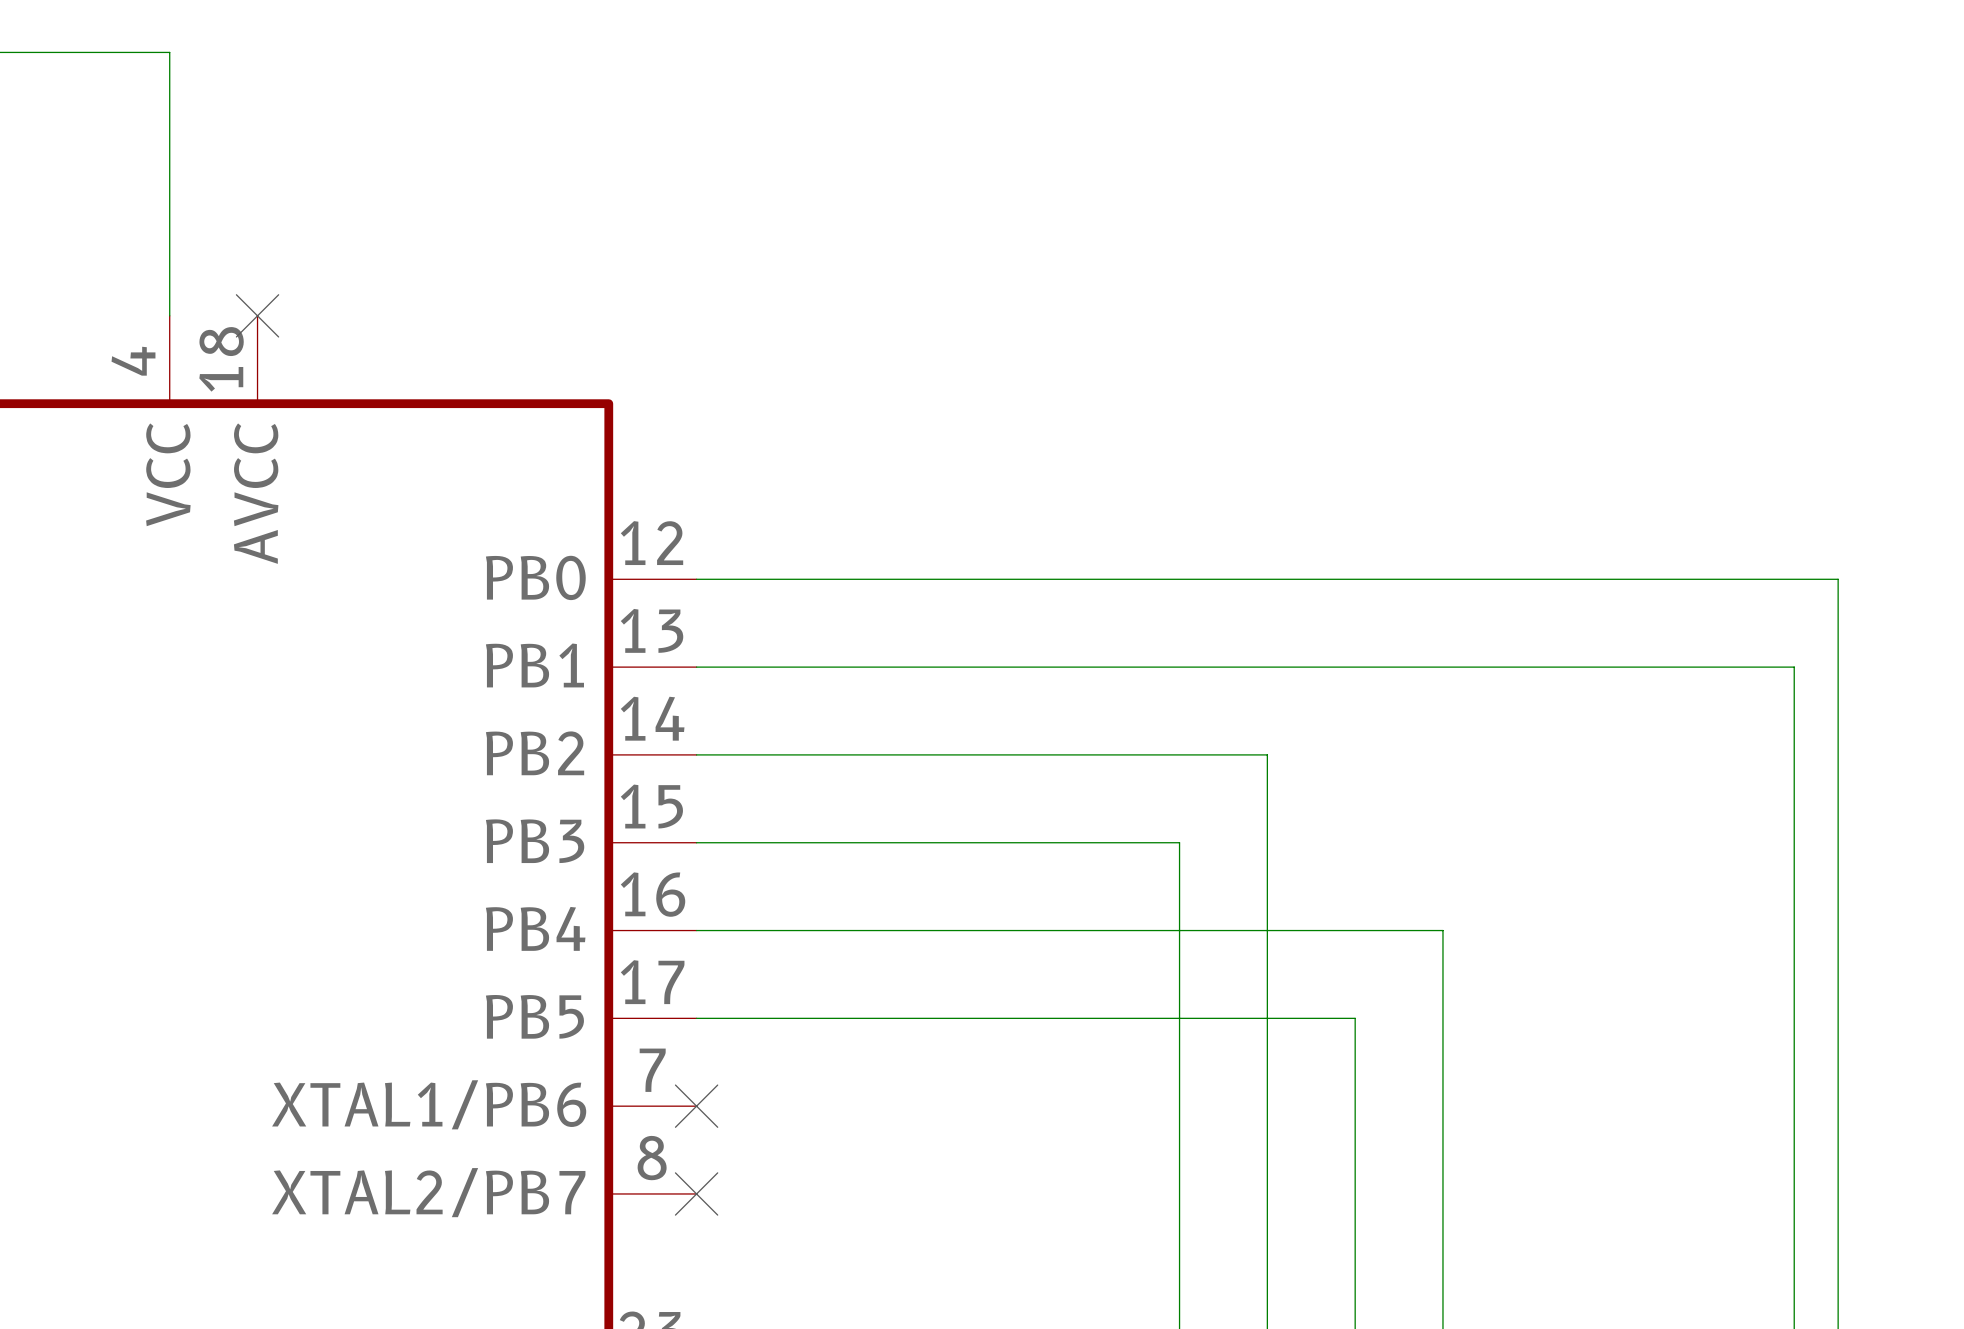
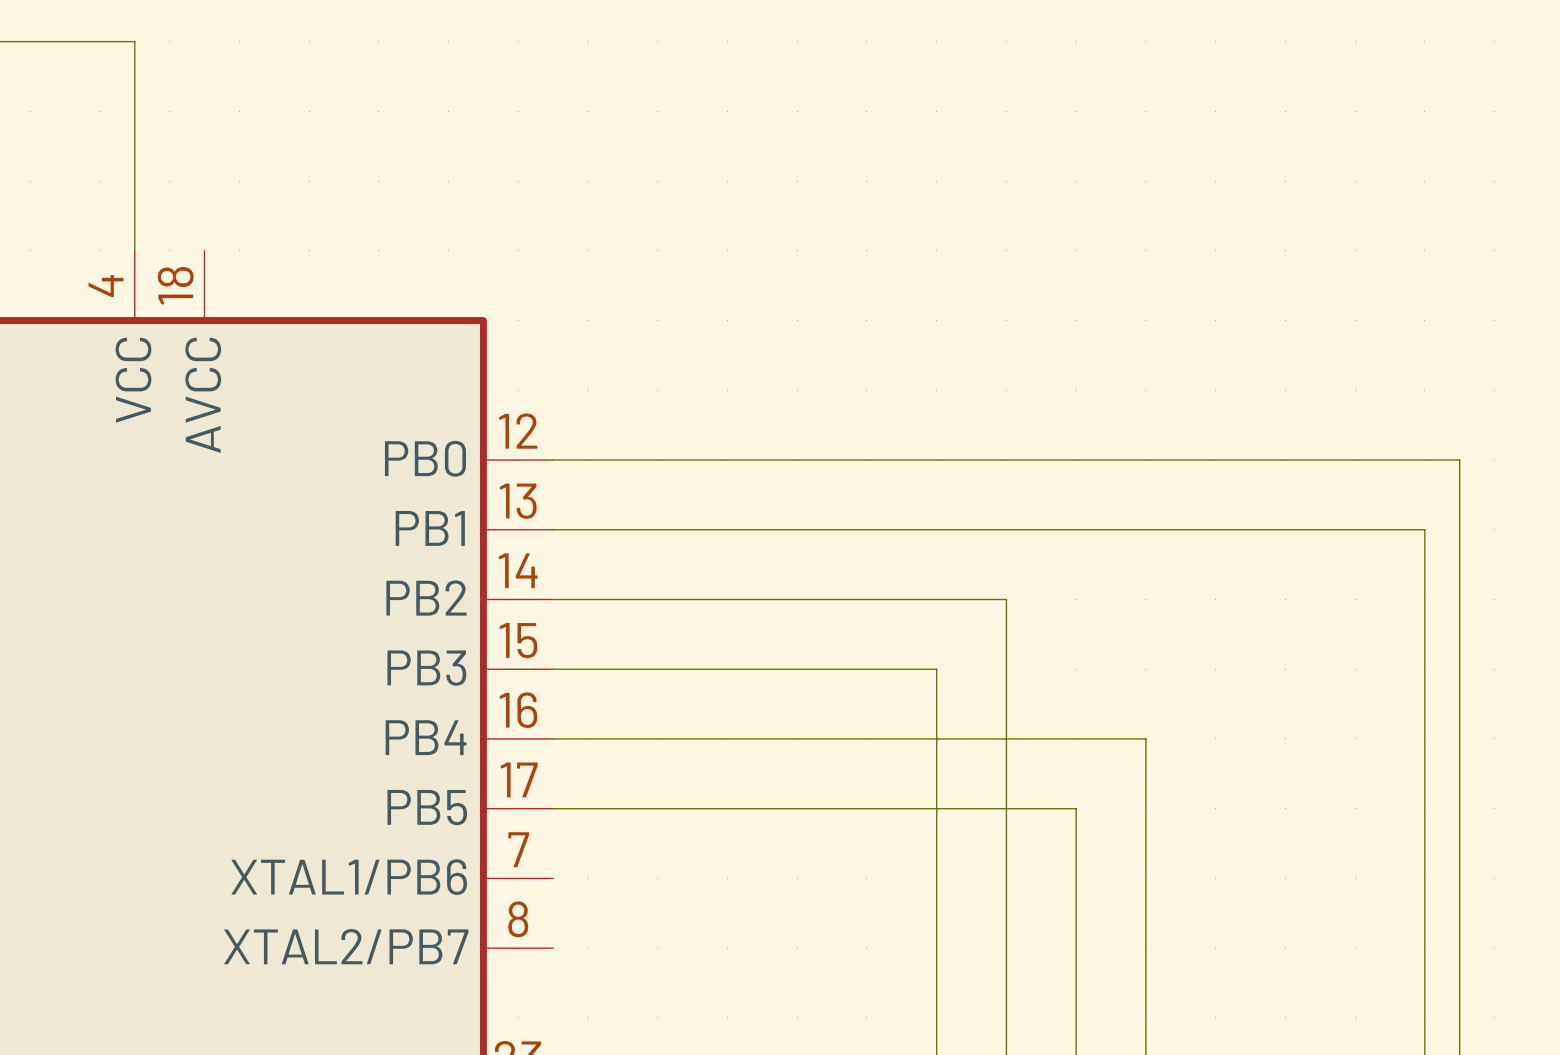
no-connect mark: (257, 315) -> none
no-connect mark: (696, 1106) -> none
no-connect mark: (696, 1193) -> none

